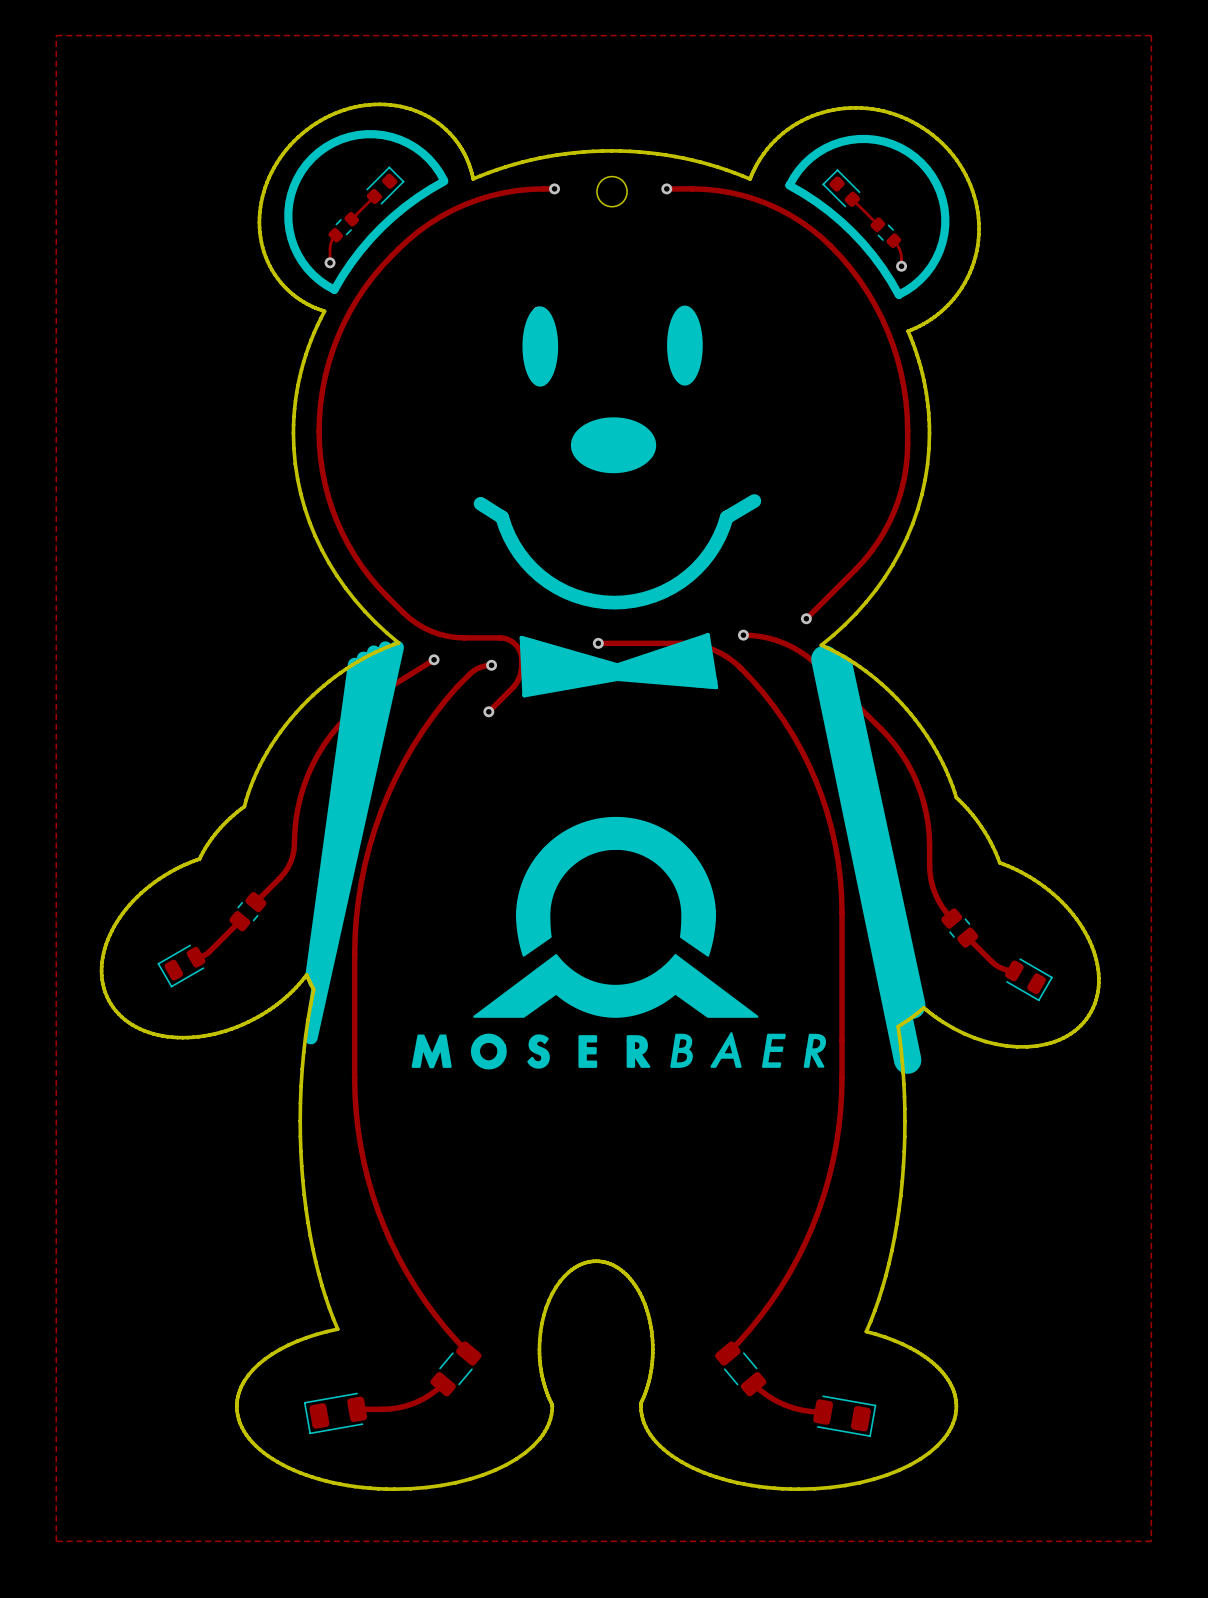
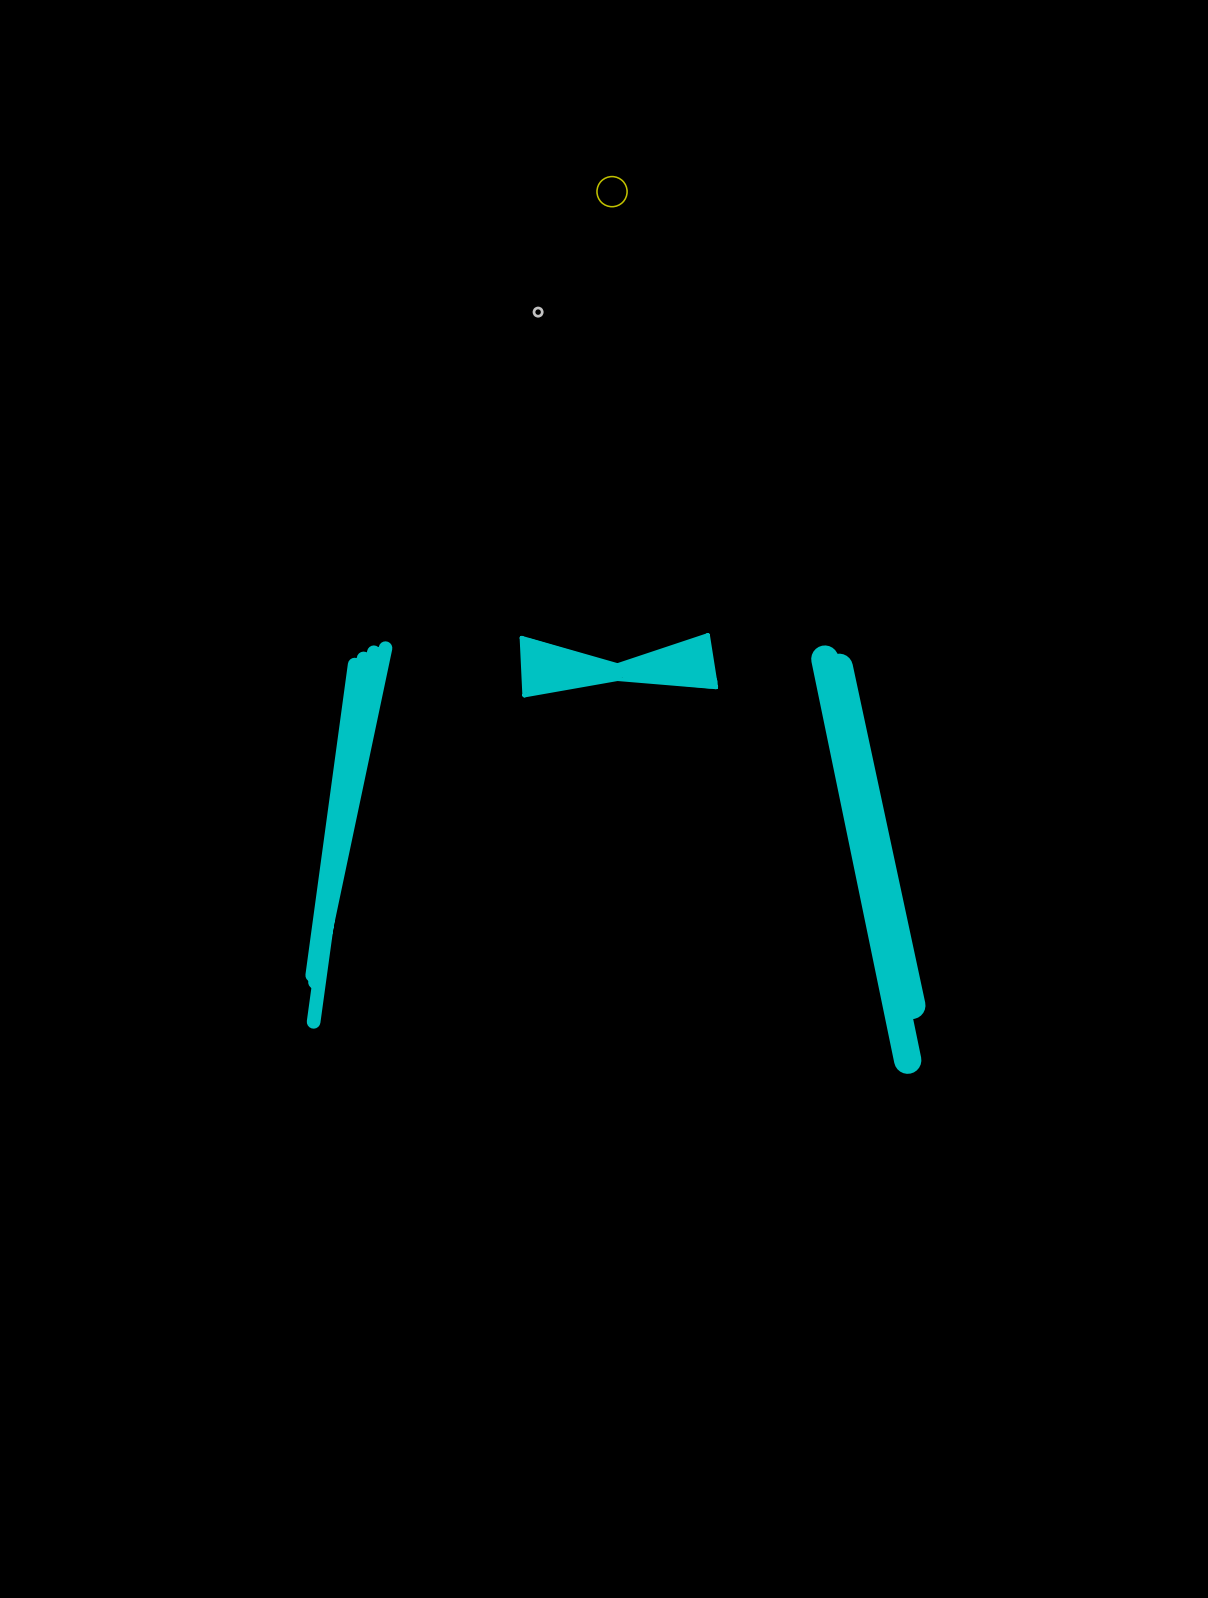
zone outline: (56, 35) (1151, 35) (1151, 1541) (56, 1541) (56, 35) -> none
board edge: (379, 104) (354, 107) (334, 113) (311, 126) (294, 141) (279, 158) (267, 182) (261, 202) (259, 227) (265, 256) (277, 278) (298, 298) (324, 311) (303, 362) (294, 408) (295, 463) (304, 508) (315, 536) (336, 575) (364, 611) (398, 642) (369, 655) (346, 668) (323, 685) (301, 706) (285, 725) (267, 752) (253, 779) (244, 806) (217, 831) (199, 859) (164, 875) (133, 901) (111, 930) (102, 962) (103, 988) (115, 1010) (136, 1027) (167, 1036) (204, 1035) (242, 1024) (280, 1001) (306, 974) (313, 989) (302, 1069) (300, 1121) (301, 1166) (312, 1248) (322, 1285) (337, 1329) (297, 1341) (272, 1354) (258, 1364) (244, 1381) (238, 1393) (236, 1406) (240, 1423) (252, 1442) (272, 1459) (306, 1475) (340, 1484) (386, 1489) (426, 1487) (455, 1482) (494, 1470) (525, 1452) (539, 1438) (547, 1427) (552, 1404) (542, 1379) (539, 1349) (540, 1331) (546, 1307) (556, 1287) (569, 1271) (584, 1262) (599, 1261) (613, 1265) (625, 1273) (638, 1290) (646, 1307) (651, 1331) (652, 1353) (649, 1378) (641, 1403) (641, 1414) (650, 1434) (667, 1452) (687, 1464) (710, 1475) (737, 1482) (766, 1487) (798, 1489) (830, 1487) (860, 1482) (886, 1475) (920, 1459) (937, 1445) (951, 1427) (956, 1406) (954, 1394) (949, 1382) (931, 1361) (902, 1344) (866, 1331) (878, 1299) (889, 1263) (900, 1195) (904, 1108) (898, 1026) (923, 1007) (953, 1028) (985, 1041) (1017, 1046) (1046, 1044) (1067, 1035) (1083, 1022) (1093, 1007) (1098, 987) (1098, 973) (1095, 955) (1079, 923) (1062, 902) (1044, 886) (1021, 872) (999, 862) (981, 826) (956, 797) (937, 752) (911, 714) (891, 693) (871, 675) (849, 659) (821, 645) (855, 613) (884, 577) (906, 537) (917, 509) (927, 464) (929, 419) (922, 374) (908, 331) (927, 321) (944, 308) (959, 291) (969, 272) (975, 256) (978, 234) (977, 212) (972, 190) (956, 160) (932, 134) (906, 118) (872, 109) (855, 107) (833, 109) (811, 116) (797, 123) (778, 136) (767, 149) (750, 179) (717, 167) (683, 158) (648, 152) (611, 150) (574, 152) (539, 158) (505, 166) (473, 178) (461, 149) (442, 126) (415, 110) (400, 106) (379, 104) -> none
line: (443, 180) (429, 159) (415, 147) (400, 139) (383, 135) (366, 134) (349, 136) (333, 142) (318, 152) (306, 164) (297, 179) (290, 195) (288, 221) (291, 238) (297, 254) (313, 274) (334, 289) (360, 250) (381, 227) (417, 197) (444, 181) -> none
part: (385, 185) -> none
line: (789, 185) (798, 170) (817, 152) (833, 144) (849, 140) (867, 138) (884, 141) (907, 152) (921, 162) (932, 176) (940, 191) (945, 217) (944, 234) (939, 251) (926, 273) (913, 285) (899, 294) -> none
line: (789, 185) (828, 211) (852, 232) (882, 268) (898, 294) -> none
track: (554, 188) (517, 190) (477, 199) (441, 216) (408, 239) (373, 276) (350, 311) (333, 349) (325, 376) (320, 403) (319, 444) (328, 496) (348, 544) (370, 577) (403, 612) (423, 627) (439, 634) (455, 637) (504, 638) (513, 642) (519, 650) (521, 665) (517, 680) (488, 711) -> none
via: (554, 188) -> none
track: (666, 188) (705, 189) (743, 195) (779, 209) (801, 221) (831, 246) (859, 280) (881, 317) (893, 345) (904, 387) (907, 416) (906, 466) (898, 500) (889, 522) (870, 552) (806, 618) -> none
via: (666, 188) -> none
part: (841, 188) -> none
track: (374, 196) (351, 219) -> none
track: (852, 199) (877, 224) -> none
part: (343, 227) -> none
part: (885, 232) -> none
track: (335, 235) (330, 243) (330, 262) -> none
track: (893, 240) (900, 251) (900, 266) -> none
via: (330, 262) -> none
via: (901, 266) -> none
drawing: [667, 305, 703, 386] -> none
drawing: [522, 306, 559, 387] -> none
drawing: [570, 417, 657, 474] -> none
line: (754, 501) (726, 517) (719, 536) (709, 553) (696, 569) (680, 581) (654, 595) (634, 600) (614, 602) (584, 598) (565, 591) (548, 581) (532, 569) (519, 553) (509, 536) (502, 517) (480, 503) -> none
via: (806, 618) -> none
track: (743, 635) (776, 640) (805, 655) (895, 745) (907, 763) (920, 792) (928, 824) (931, 879) (938, 900) (951, 918) -> none
via: (743, 635) -> none
track: (598, 643) (689, 643) (713, 649) (734, 662) (773, 706) (801, 749) (821, 796) (835, 845) (841, 895) (841, 1077) (838, 1128) (832, 1162) (812, 1227) (789, 1272) (761, 1315) (727, 1353) -> none
via: (598, 643) -> none
line: (397, 647) (310, 1037) -> none
track: (434, 659) (354, 709) (331, 734) (312, 764) (303, 785) (297, 808) (294, 849) (290, 862) (284, 873) (255, 902) -> none
via: (434, 659) -> none
track: (491, 665) (479, 667) (471, 672) (445, 701) (423, 730) (395, 778) (381, 811) (369, 846) (361, 882) (355, 936) (355, 1094) (360, 1145) (367, 1178) (384, 1227) (406, 1272) (435, 1315) (468, 1353) -> none
via: (491, 665) -> none
via: (488, 711) -> none
drawing: [470, 816, 786, 1070] -> none
part: (247, 911) -> none
track: (239, 921) (208, 952) (196, 957) -> none
part: (959, 928) -> none
track: (967, 937) (994, 964) (1006, 969) (1014, 970) -> none
part: (181, 966) -> none
part: (1028, 979) -> none
drawing: [803, 1033, 827, 1068] -> none
drawing: [411, 1034, 452, 1069] -> none
drawing: [527, 1034, 550, 1069] -> none
drawing: [578, 1035, 598, 1068] -> none
drawing: [626, 1035, 651, 1068] -> none
part: (455, 1368) -> none
part: (740, 1368) -> none
track: (443, 1384) (430, 1394) (407, 1405) (390, 1408) (357, 1409) -> none
track: (753, 1384) (767, 1396) (784, 1404) (802, 1410) (823, 1412) -> none
part: (335, 1413) -> none
part: (844, 1416) -> none

